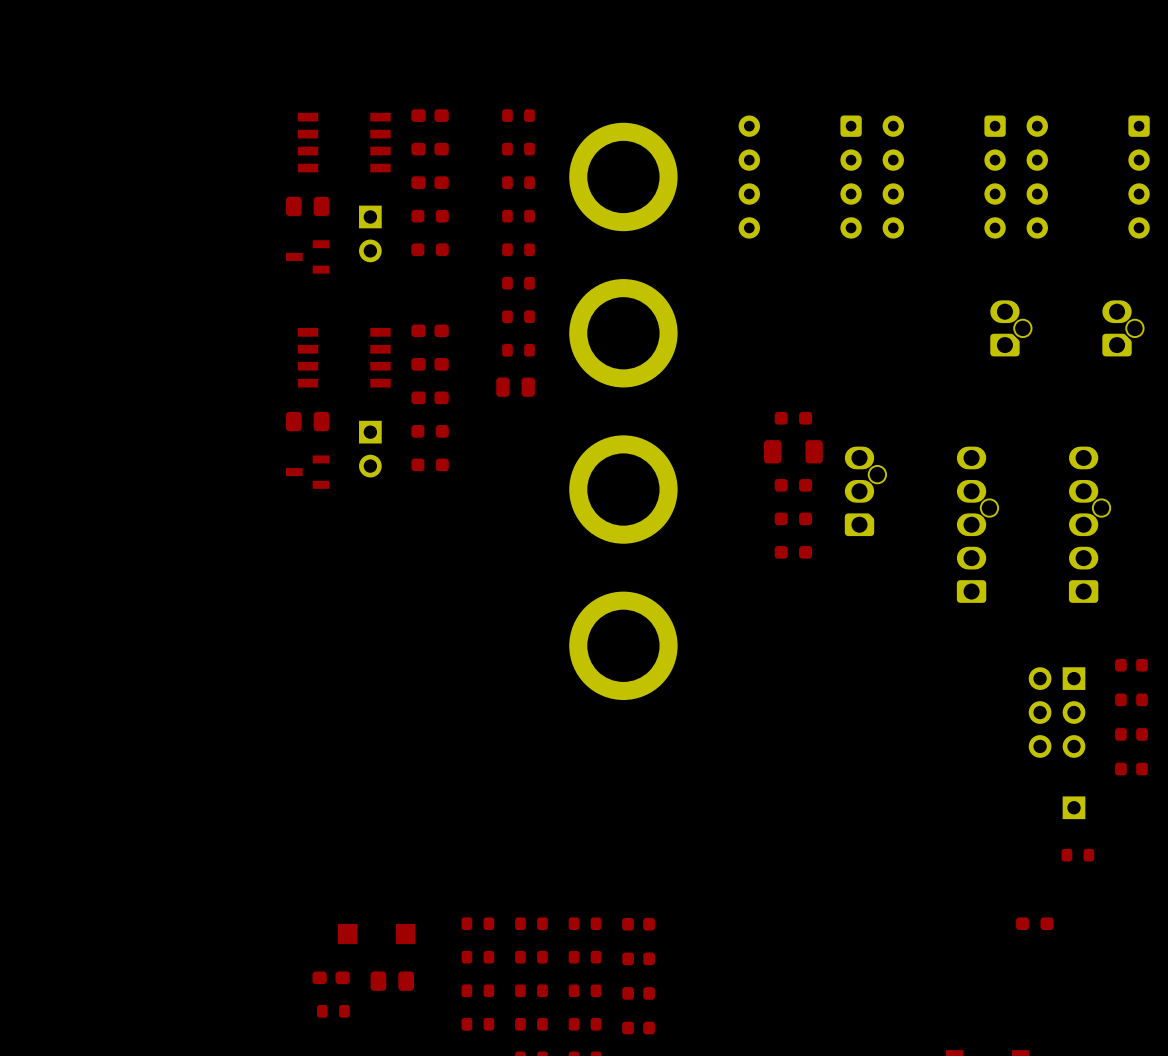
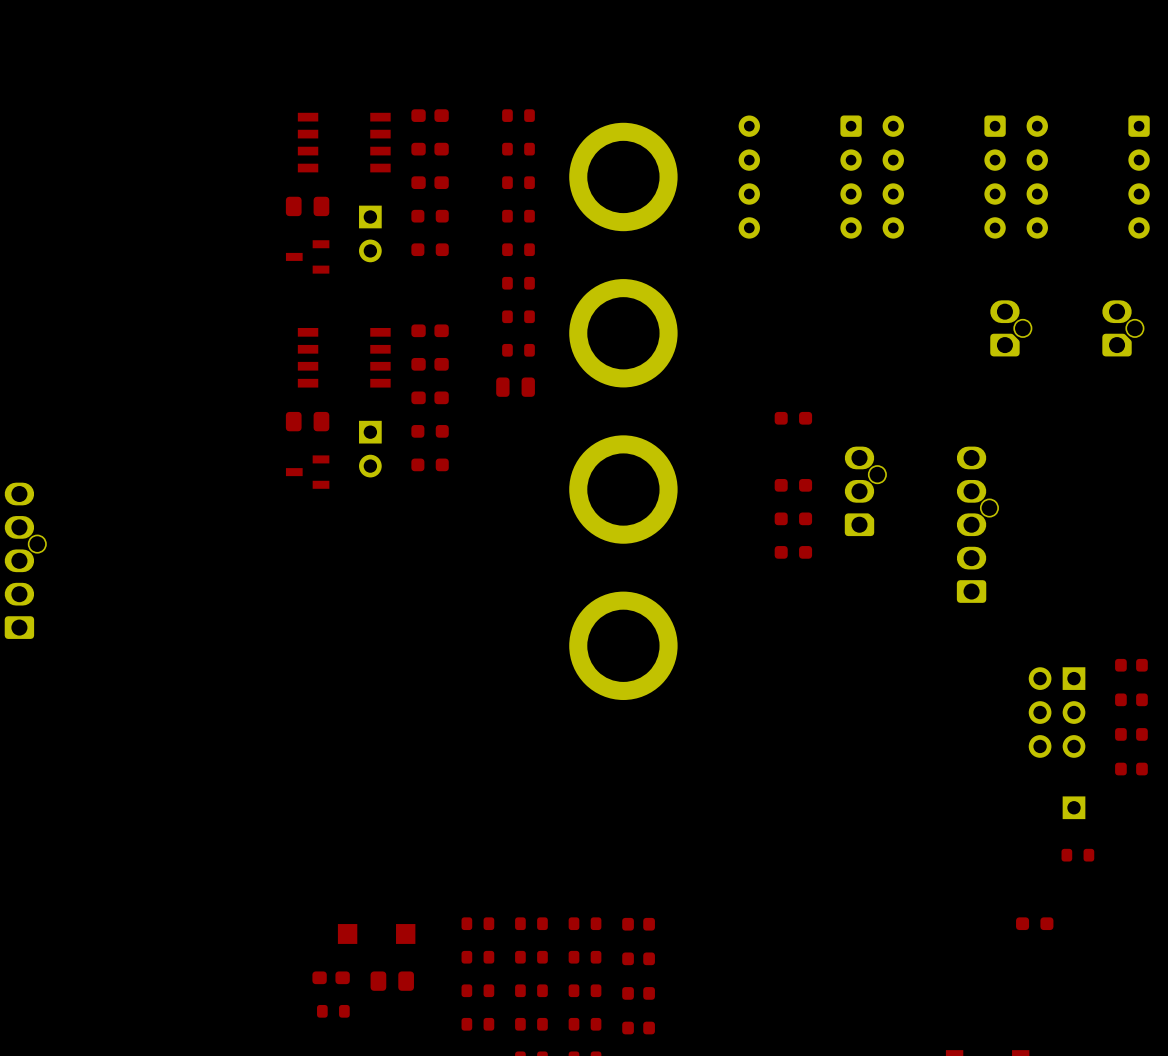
part: (793, 451) -> none
part: (1089, 524) -> none
part: none -> (25, 560)

